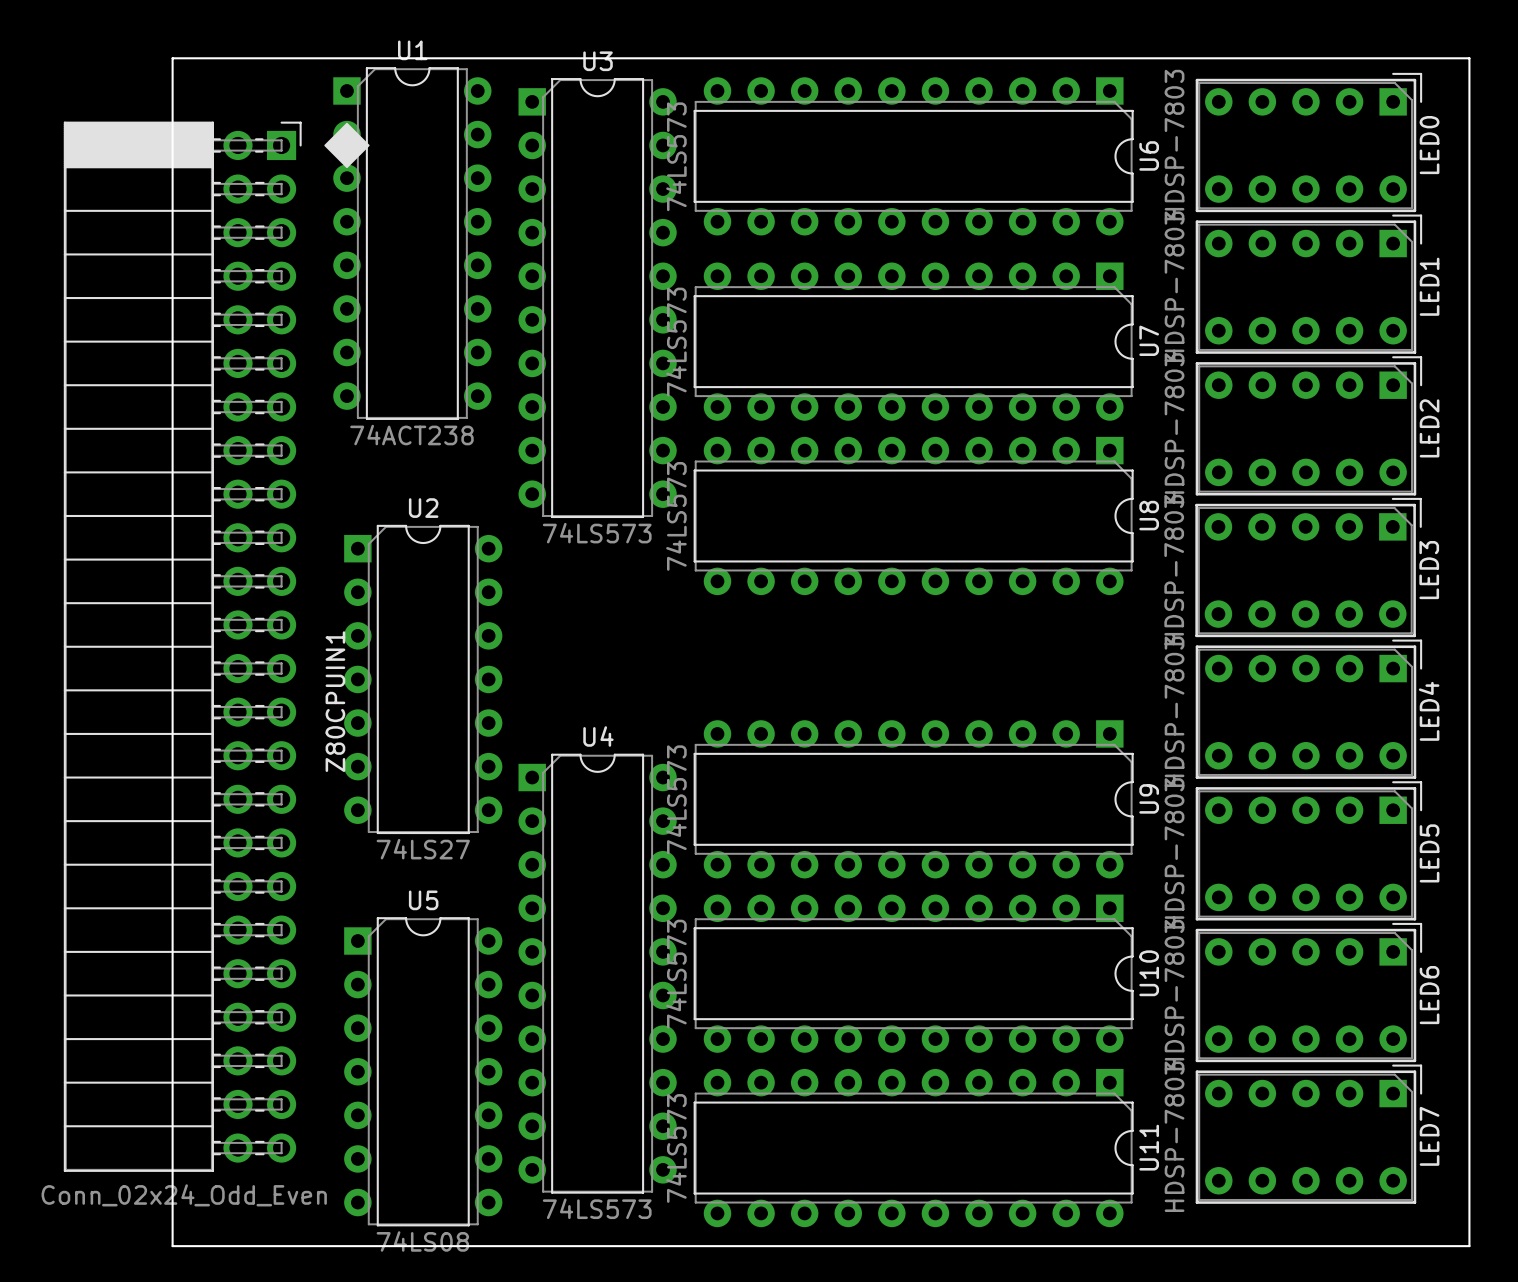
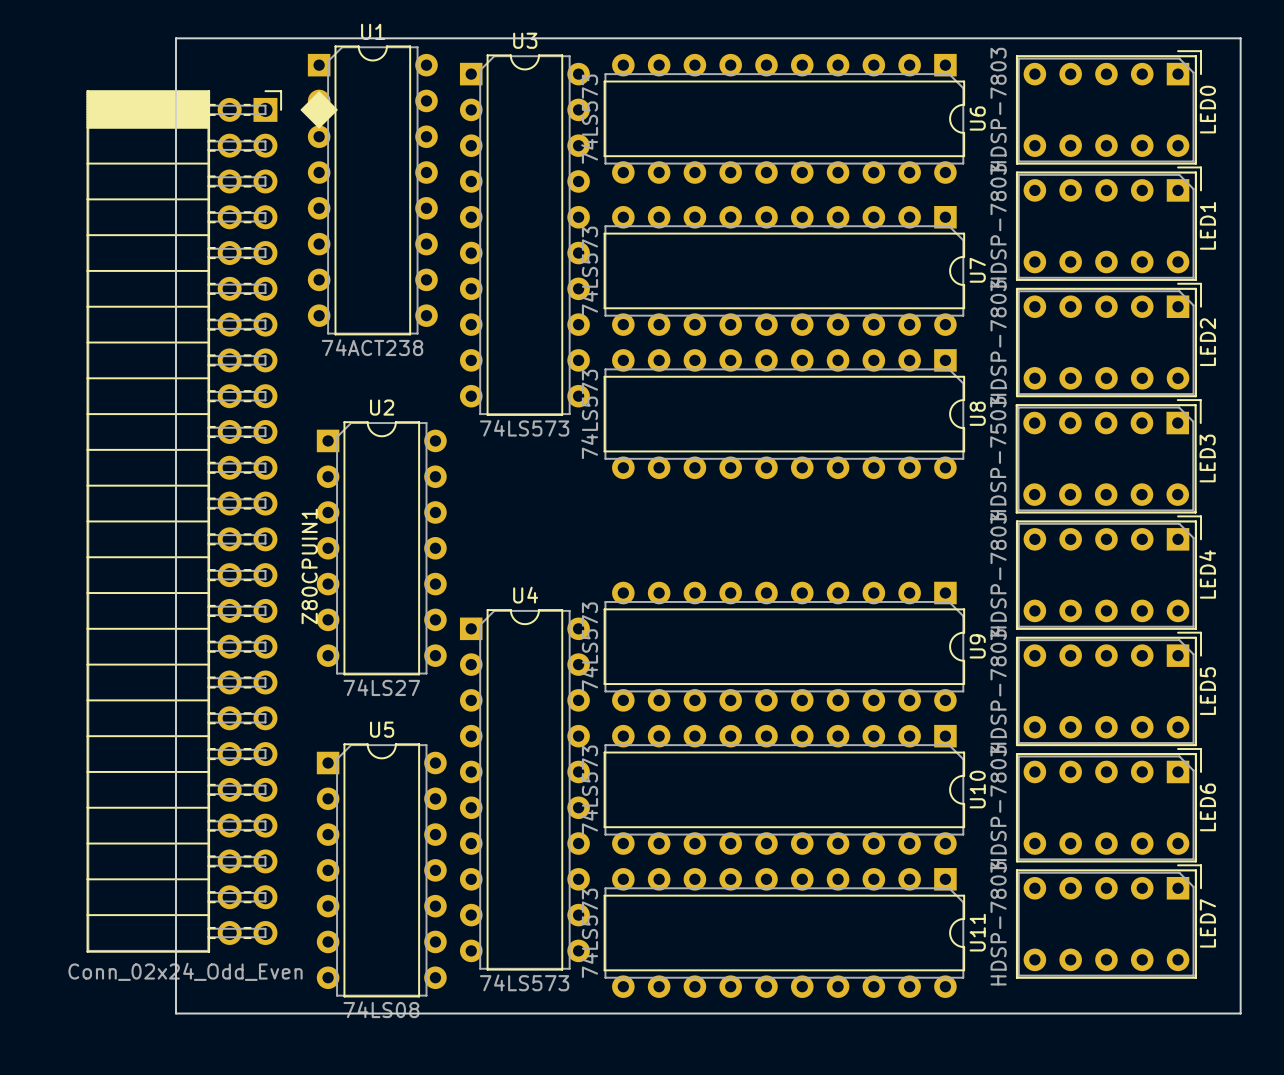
LED3 value: HDSP-7803 (1174, 570) -> HDSP-7503 (998, 458)

